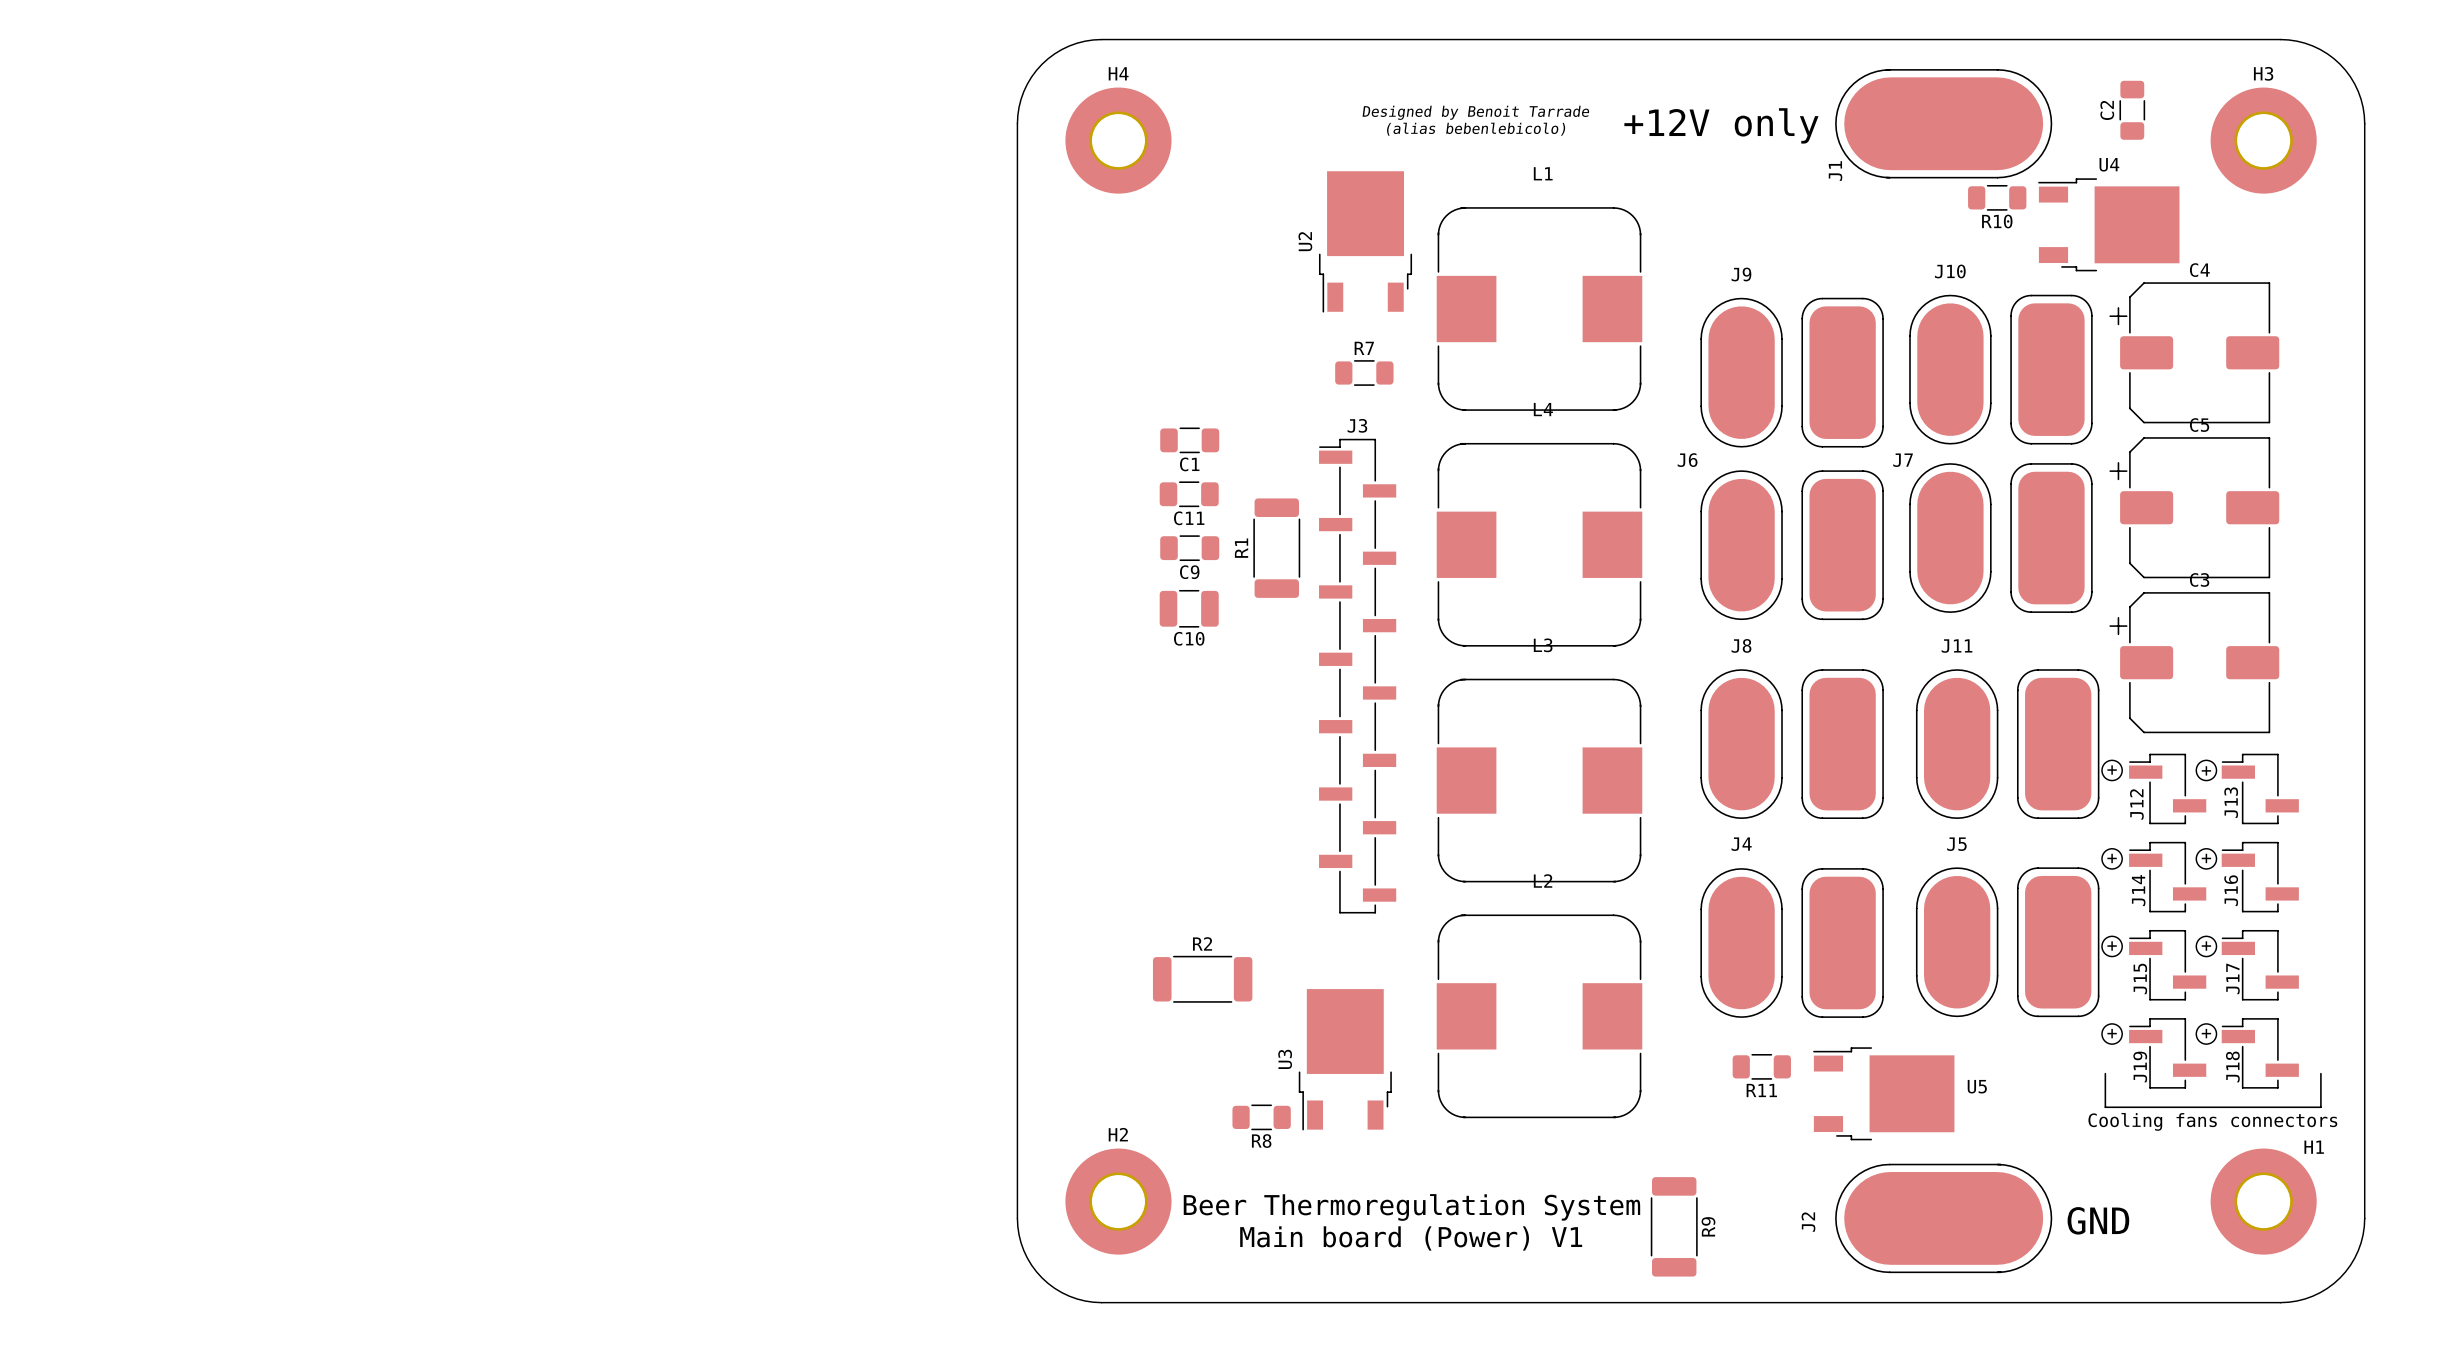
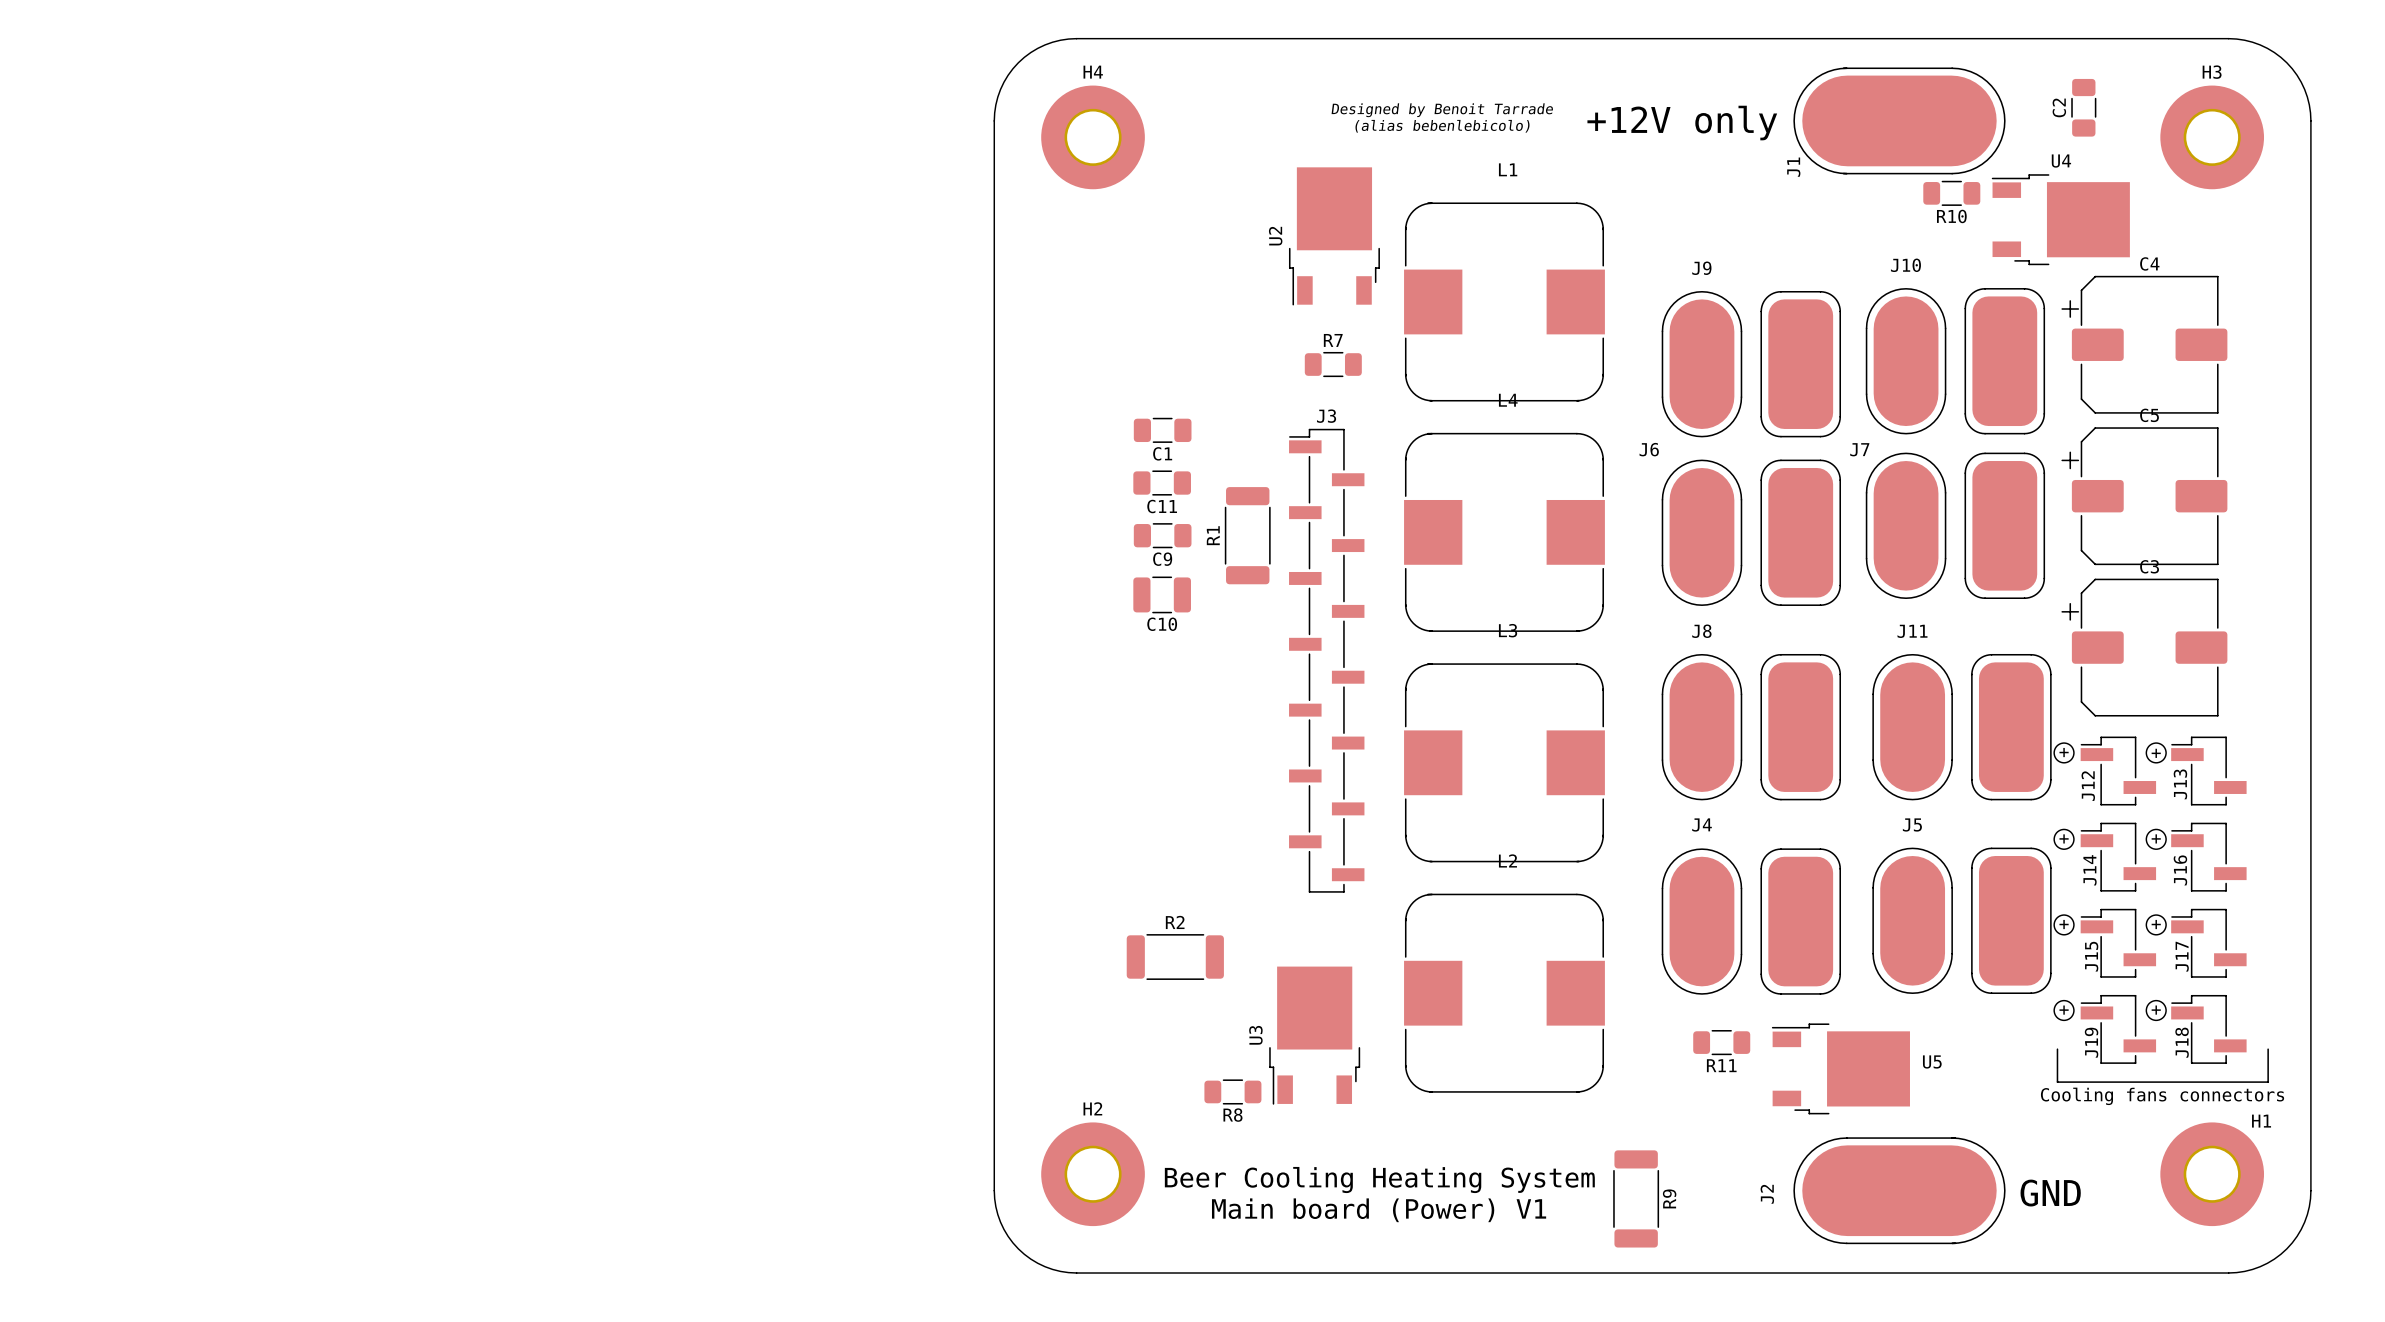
text: Beer Thermoregulation System (1411, 1207) -> Beer Cooling Heating System (1379, 1180)

